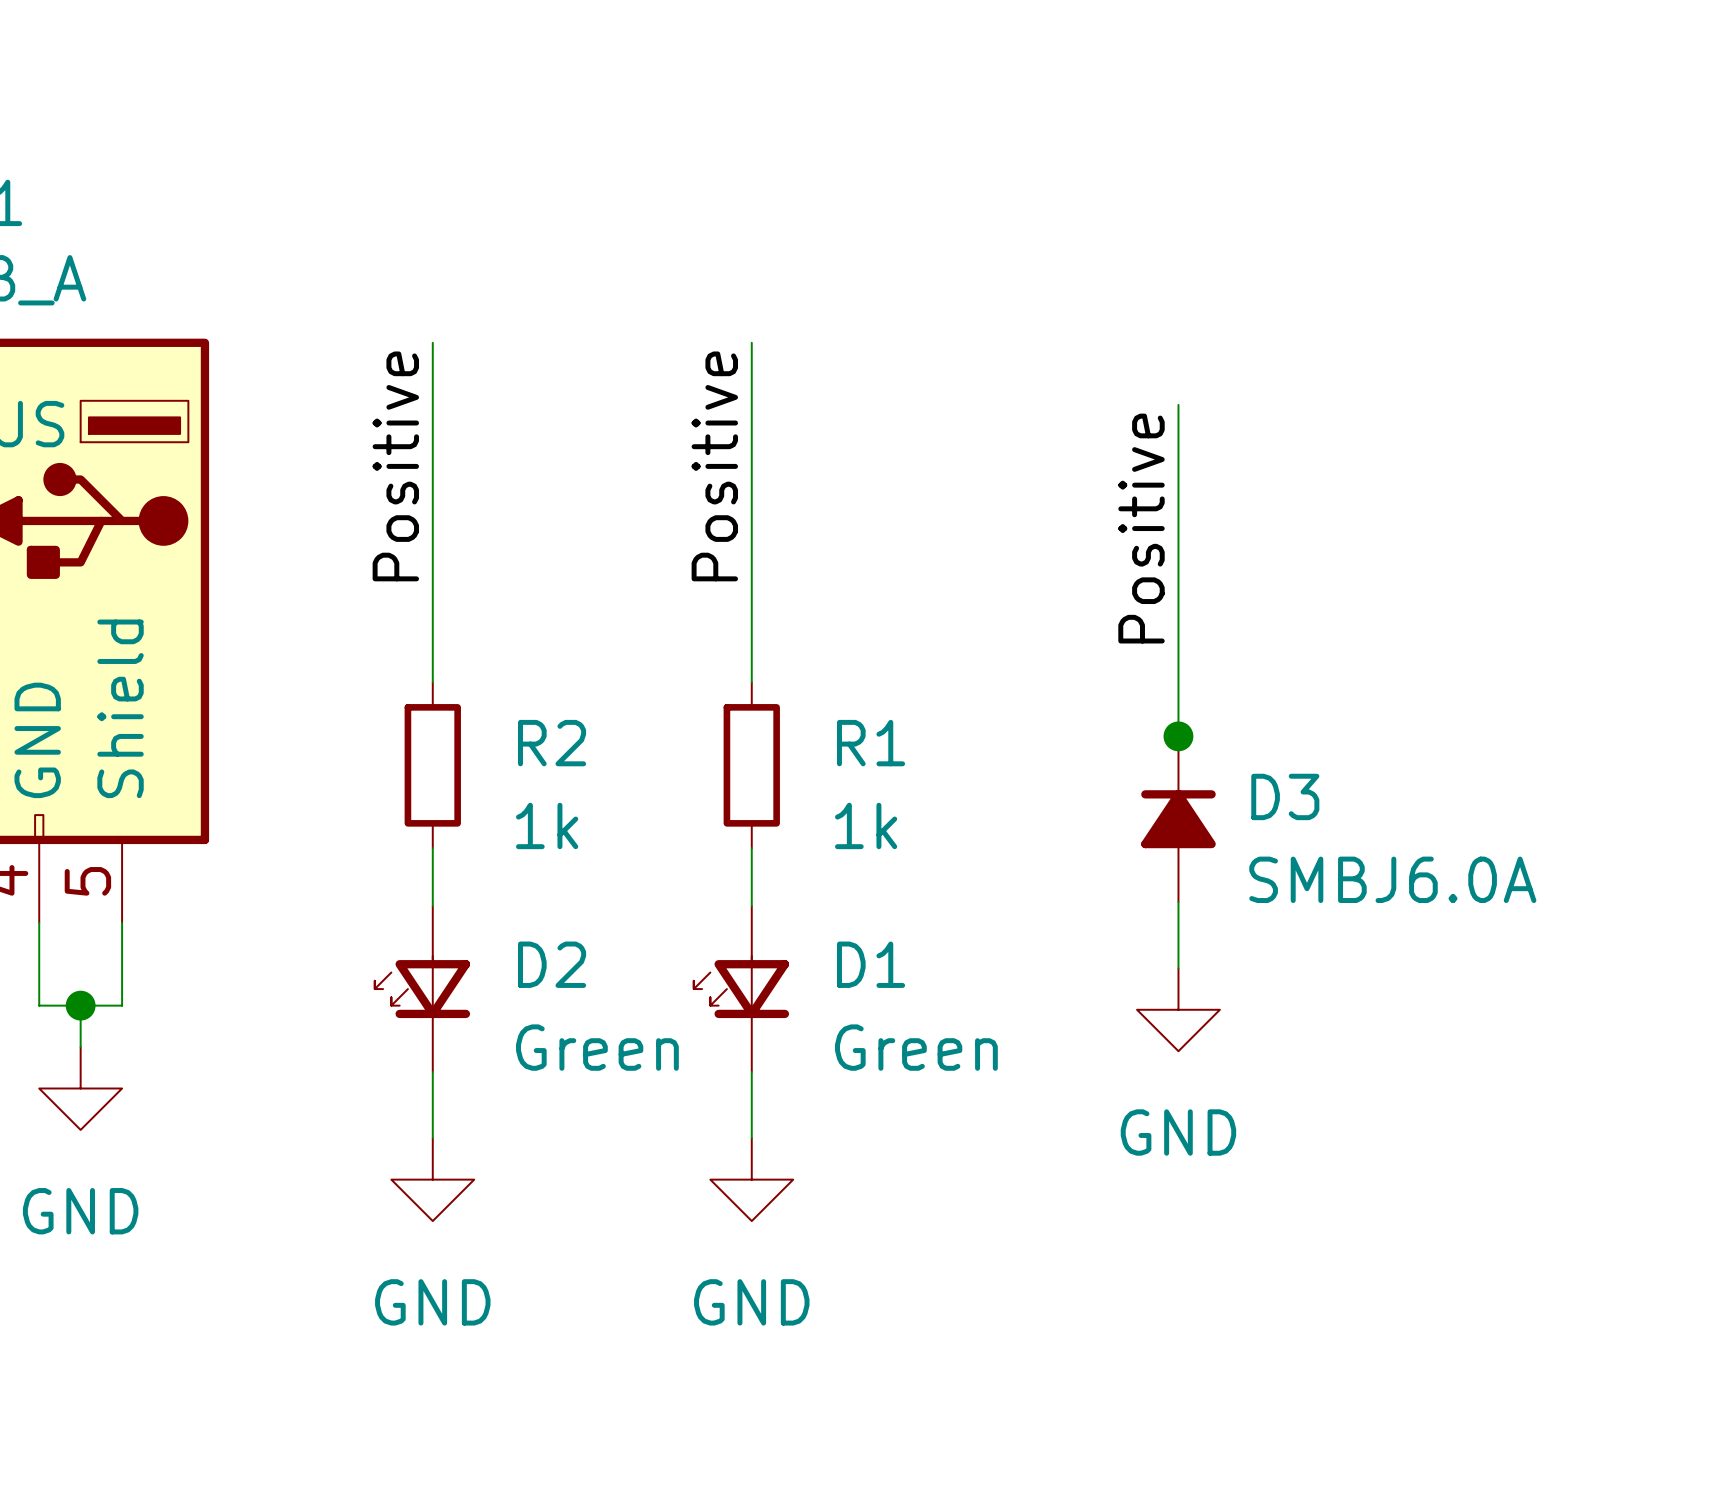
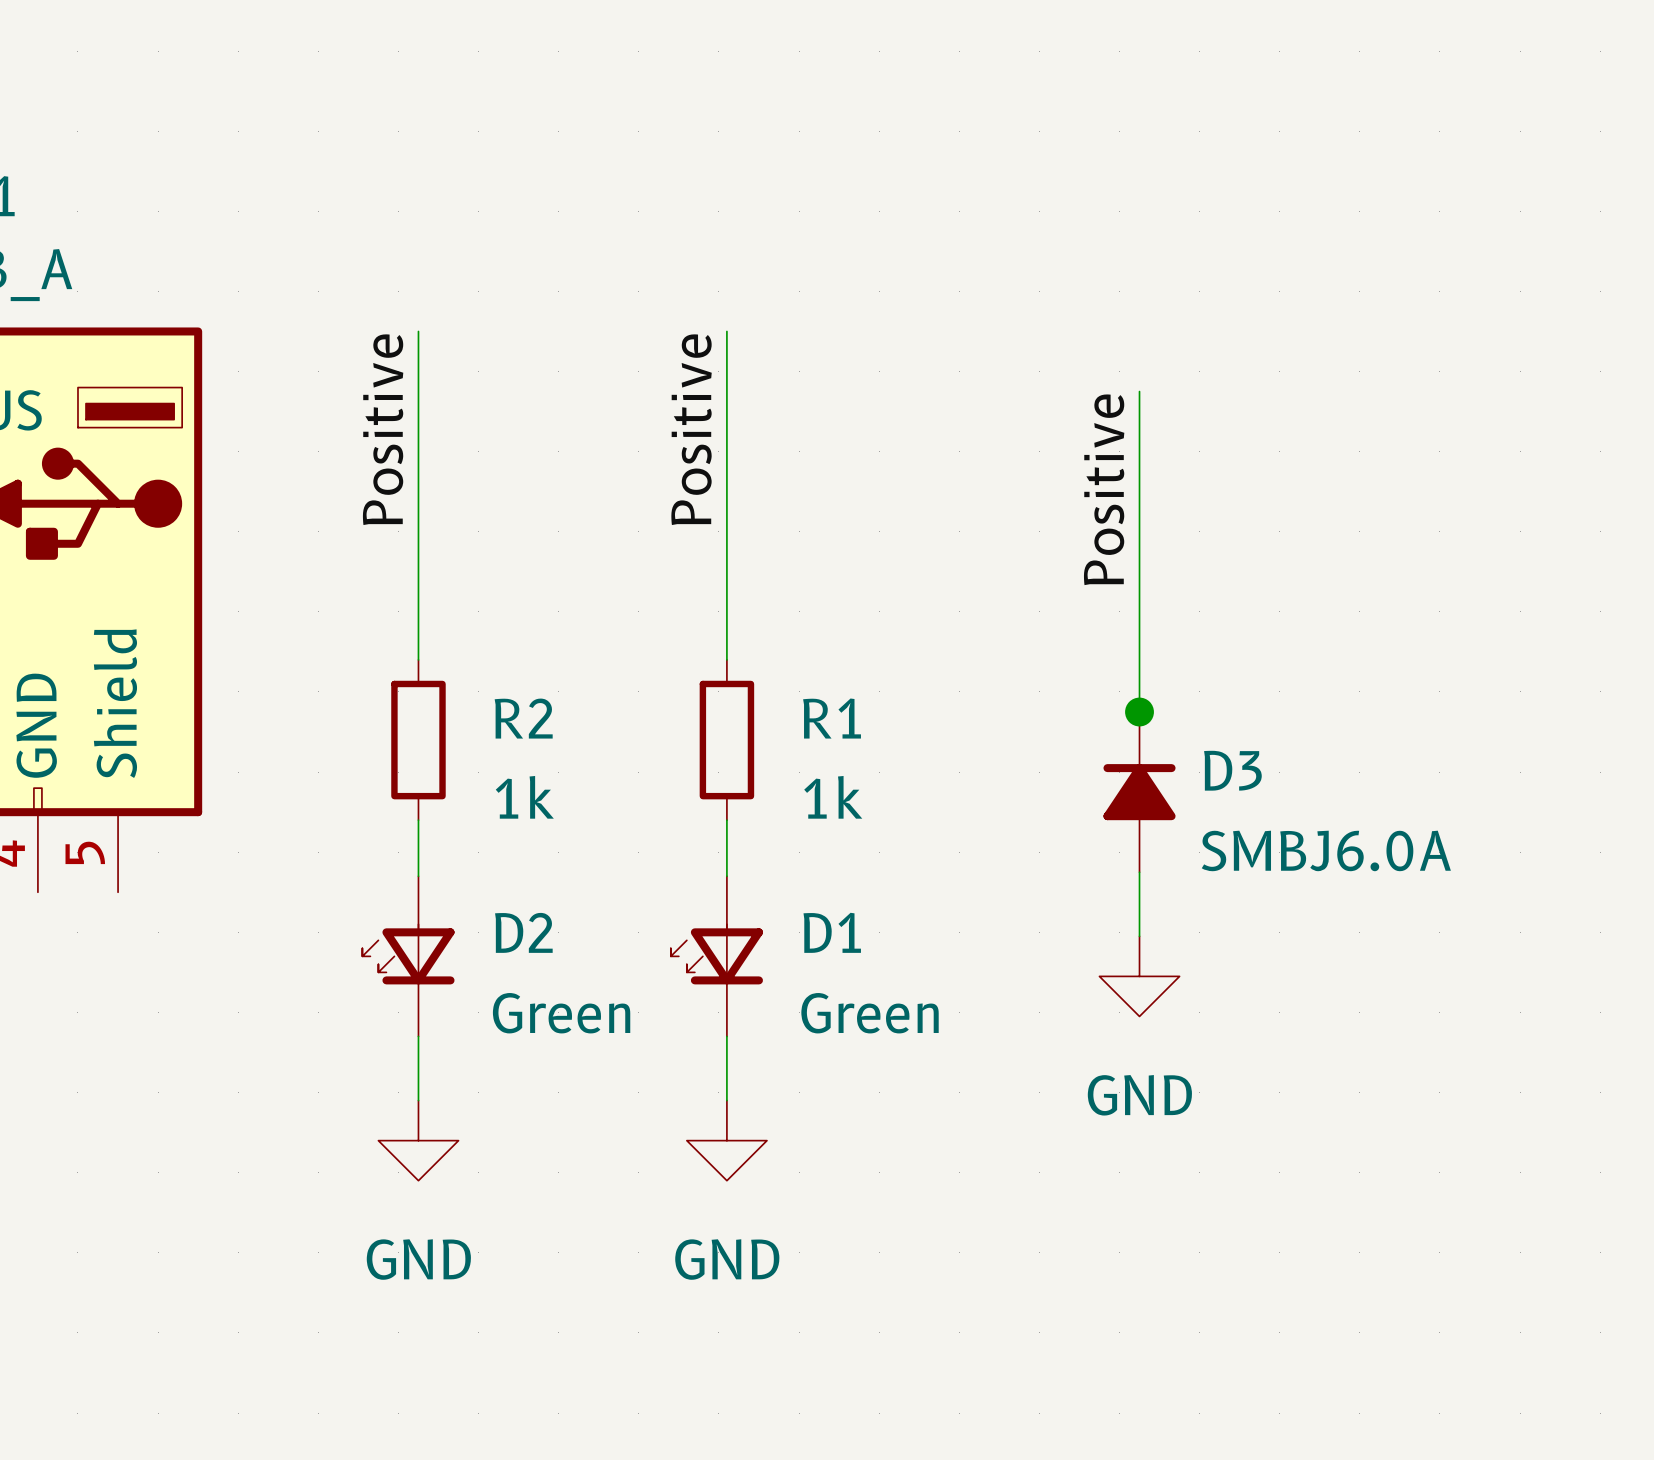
wire: (39, 922) (39, 1005) (122, 1005) (122, 922) -> none
wire: (80, 1005) (80, 1047) -> none
junction: (80, 1005) -> none
power symbol: GND (80, 1088) -> none

